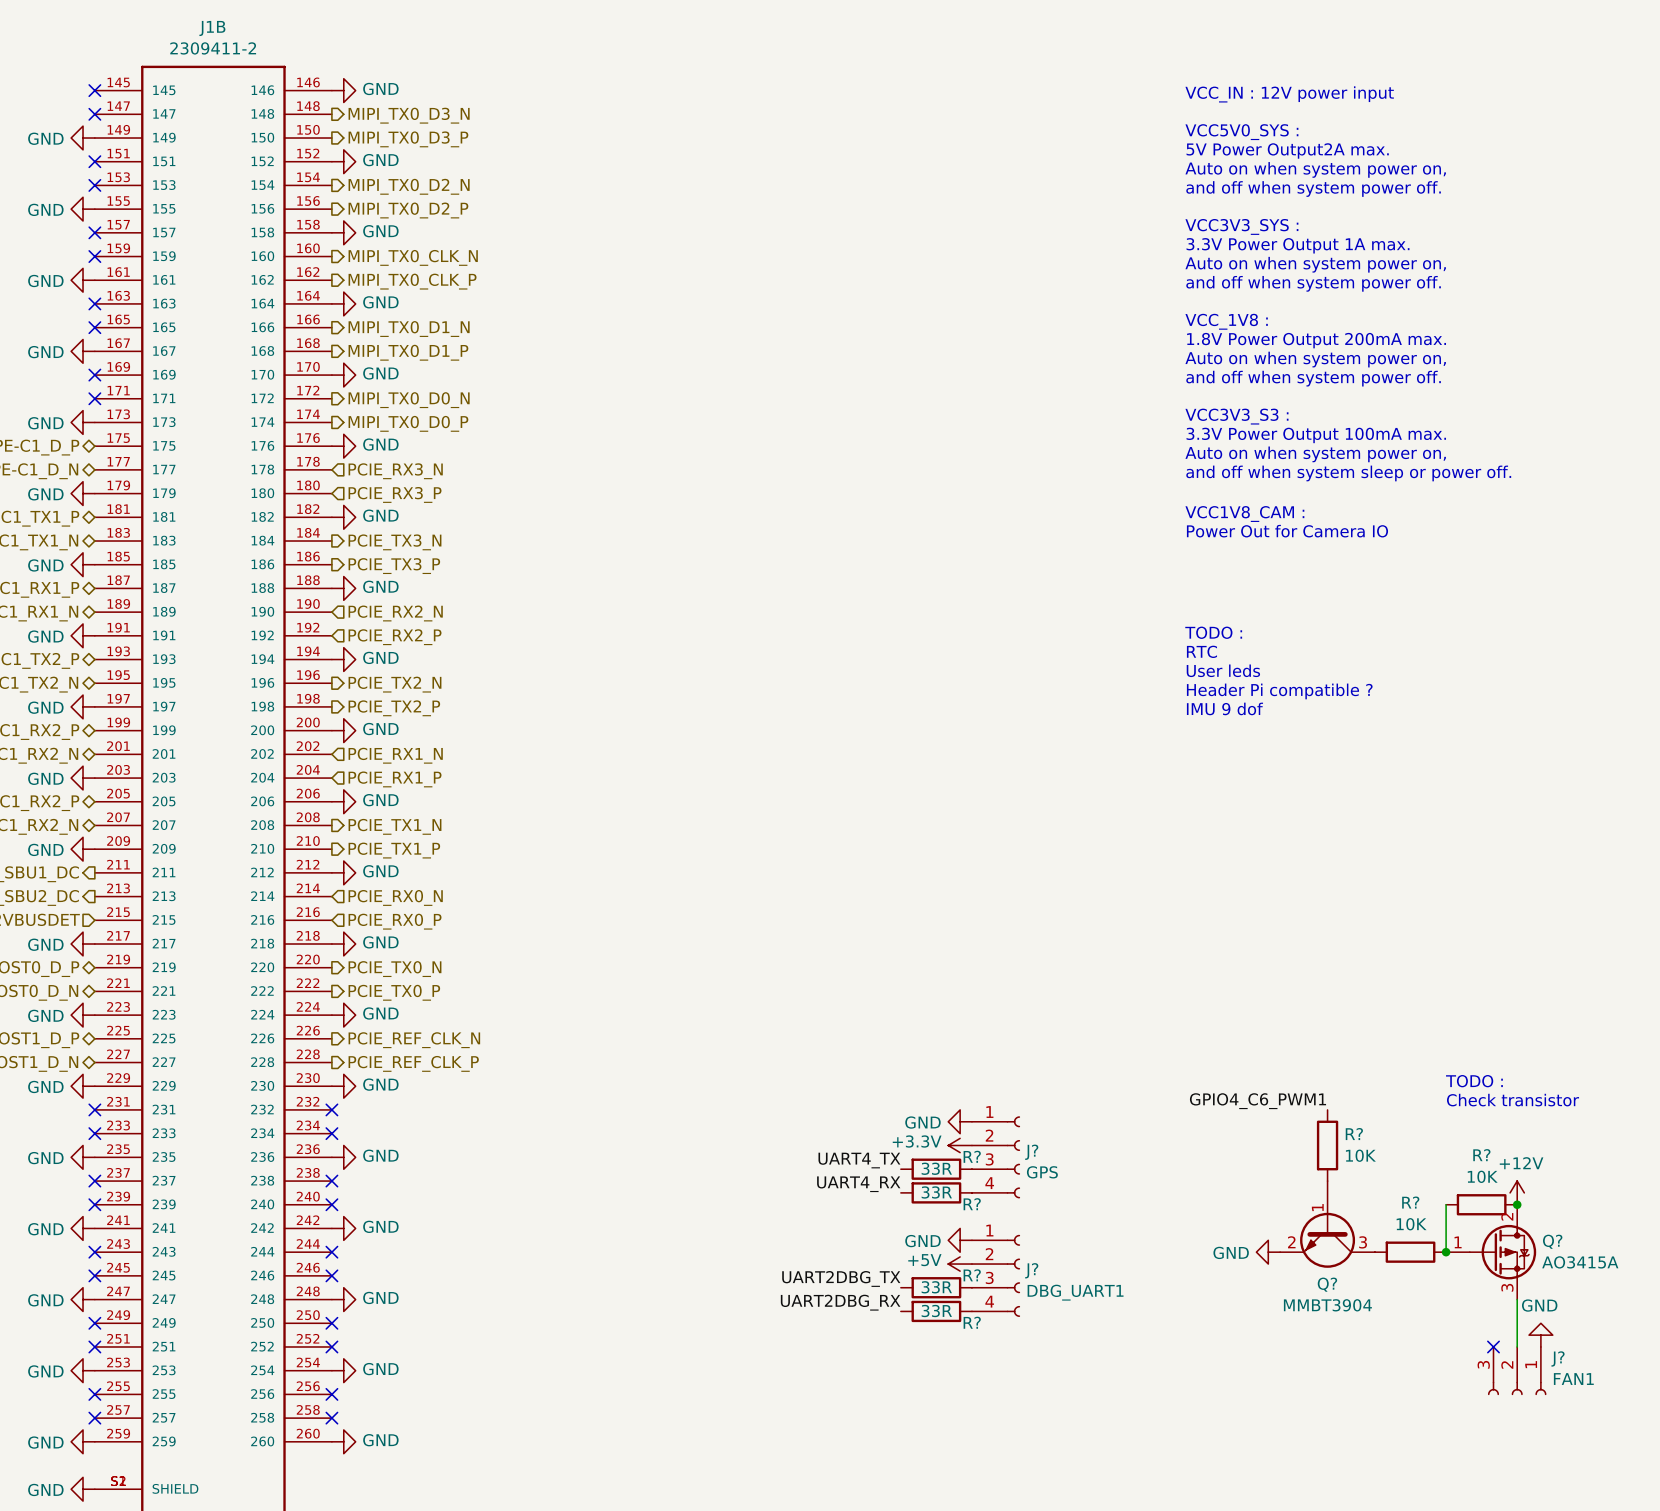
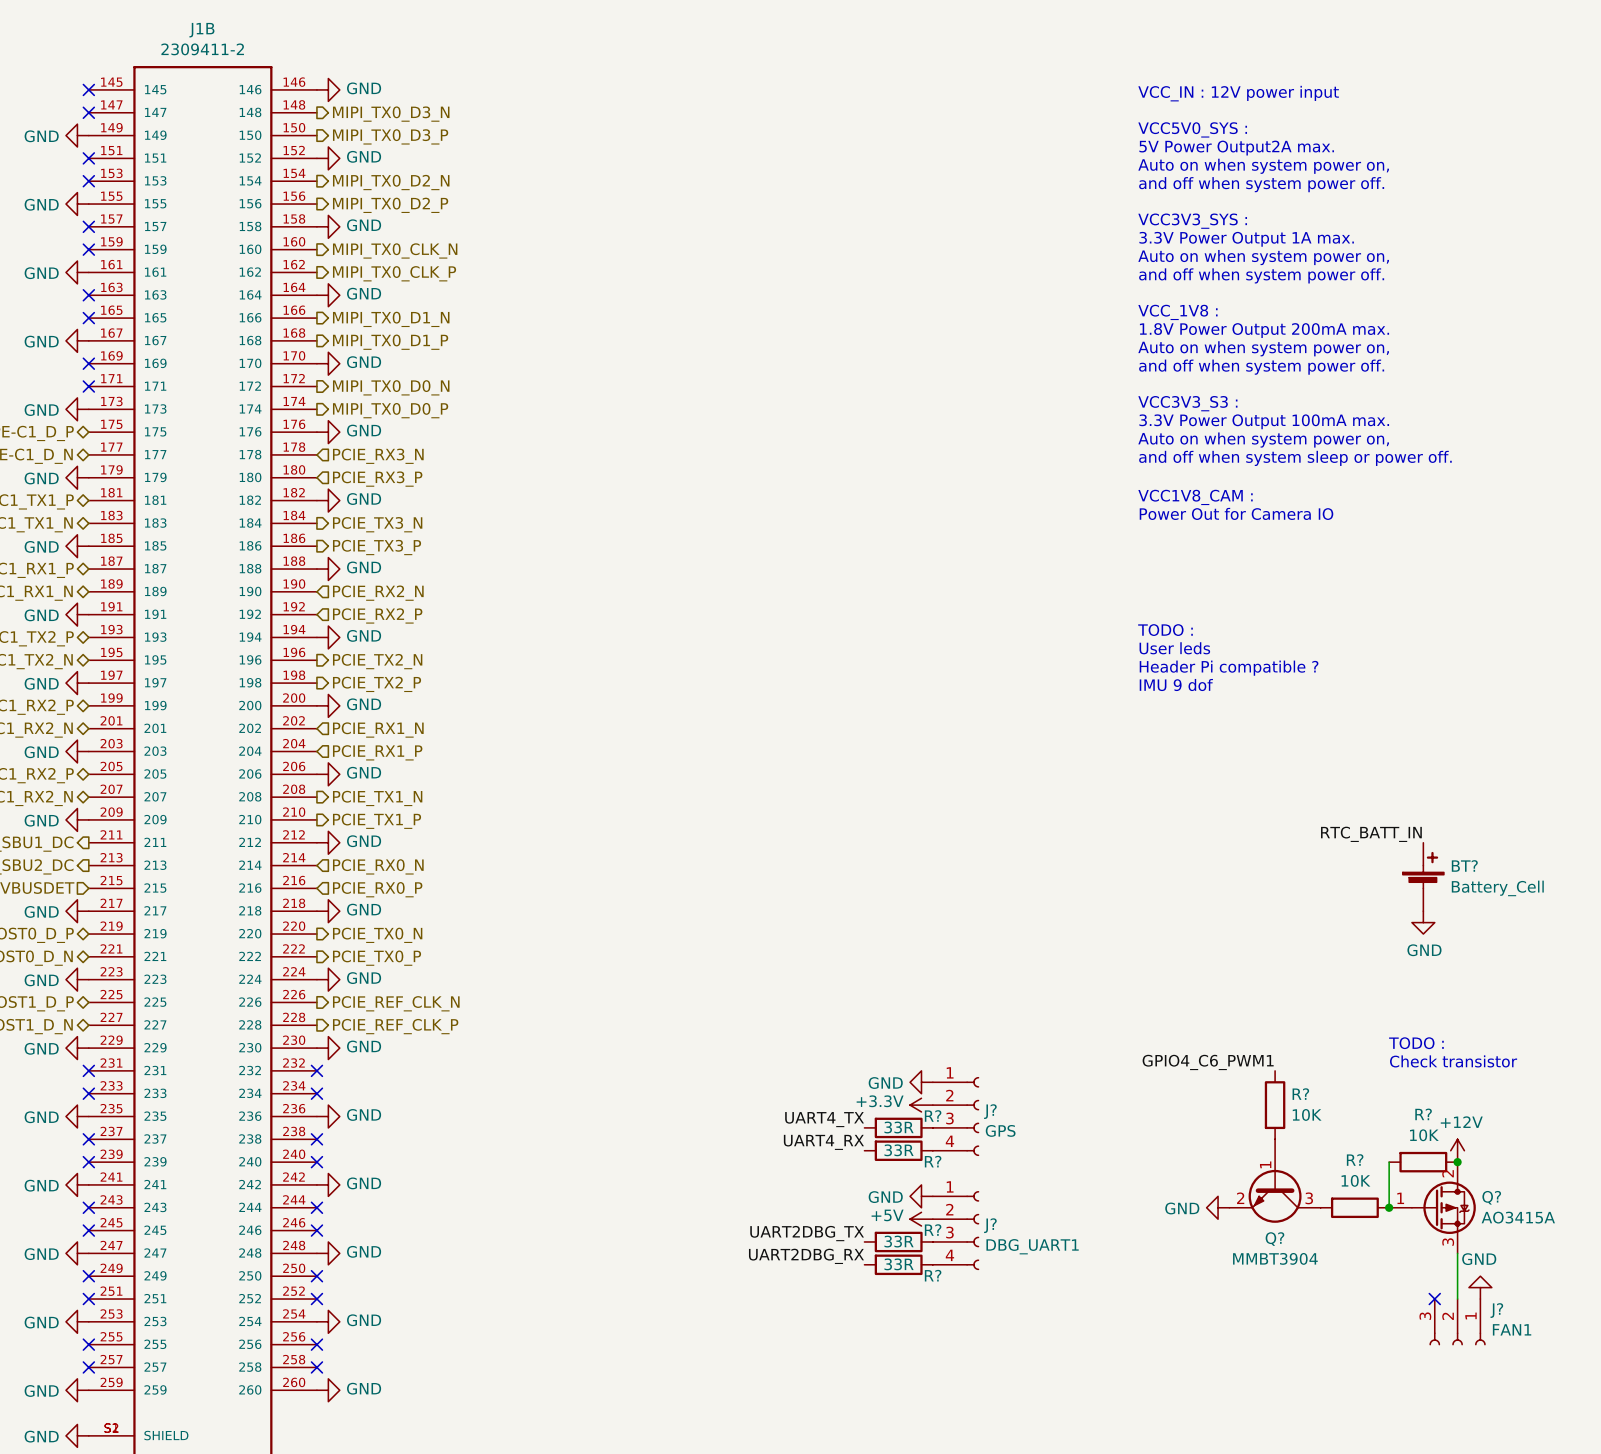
text: TODO : (1213, 632) -> none
text: RTC (1201, 651) -> TODO : (1165, 630)
label: none -> RTC_BATT_IN (1371, 834)
BT?: none -> Battery_Cell (1423, 876)
power symbol: none -> GND (1423, 922)

